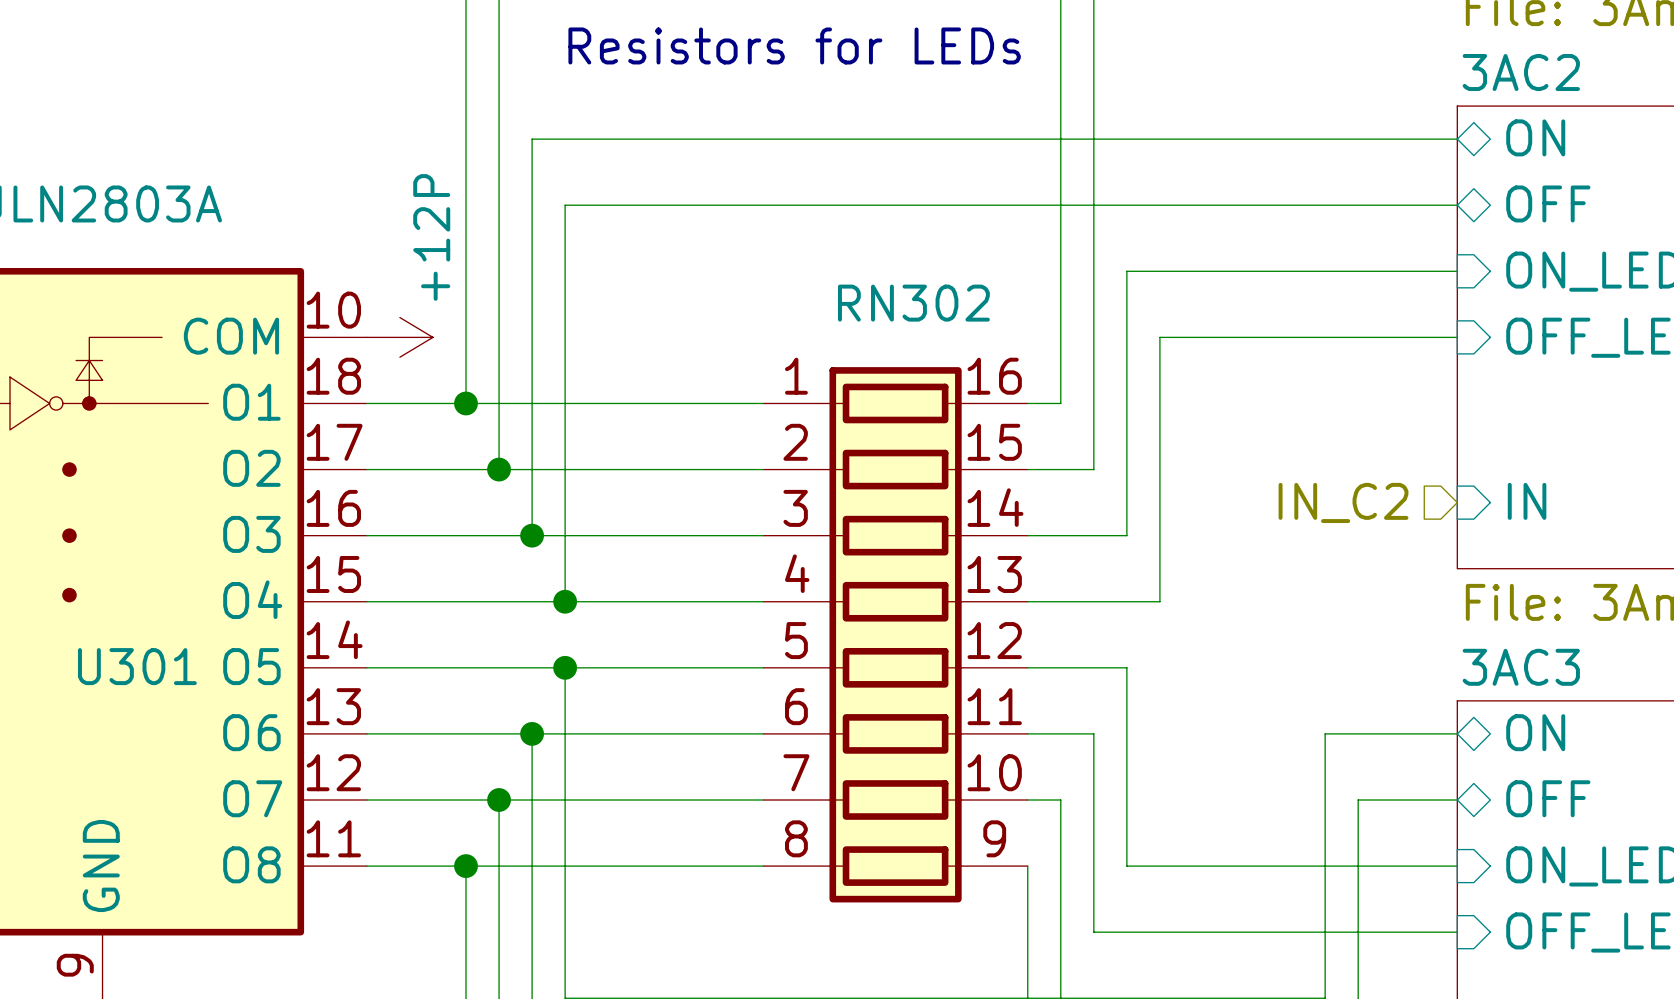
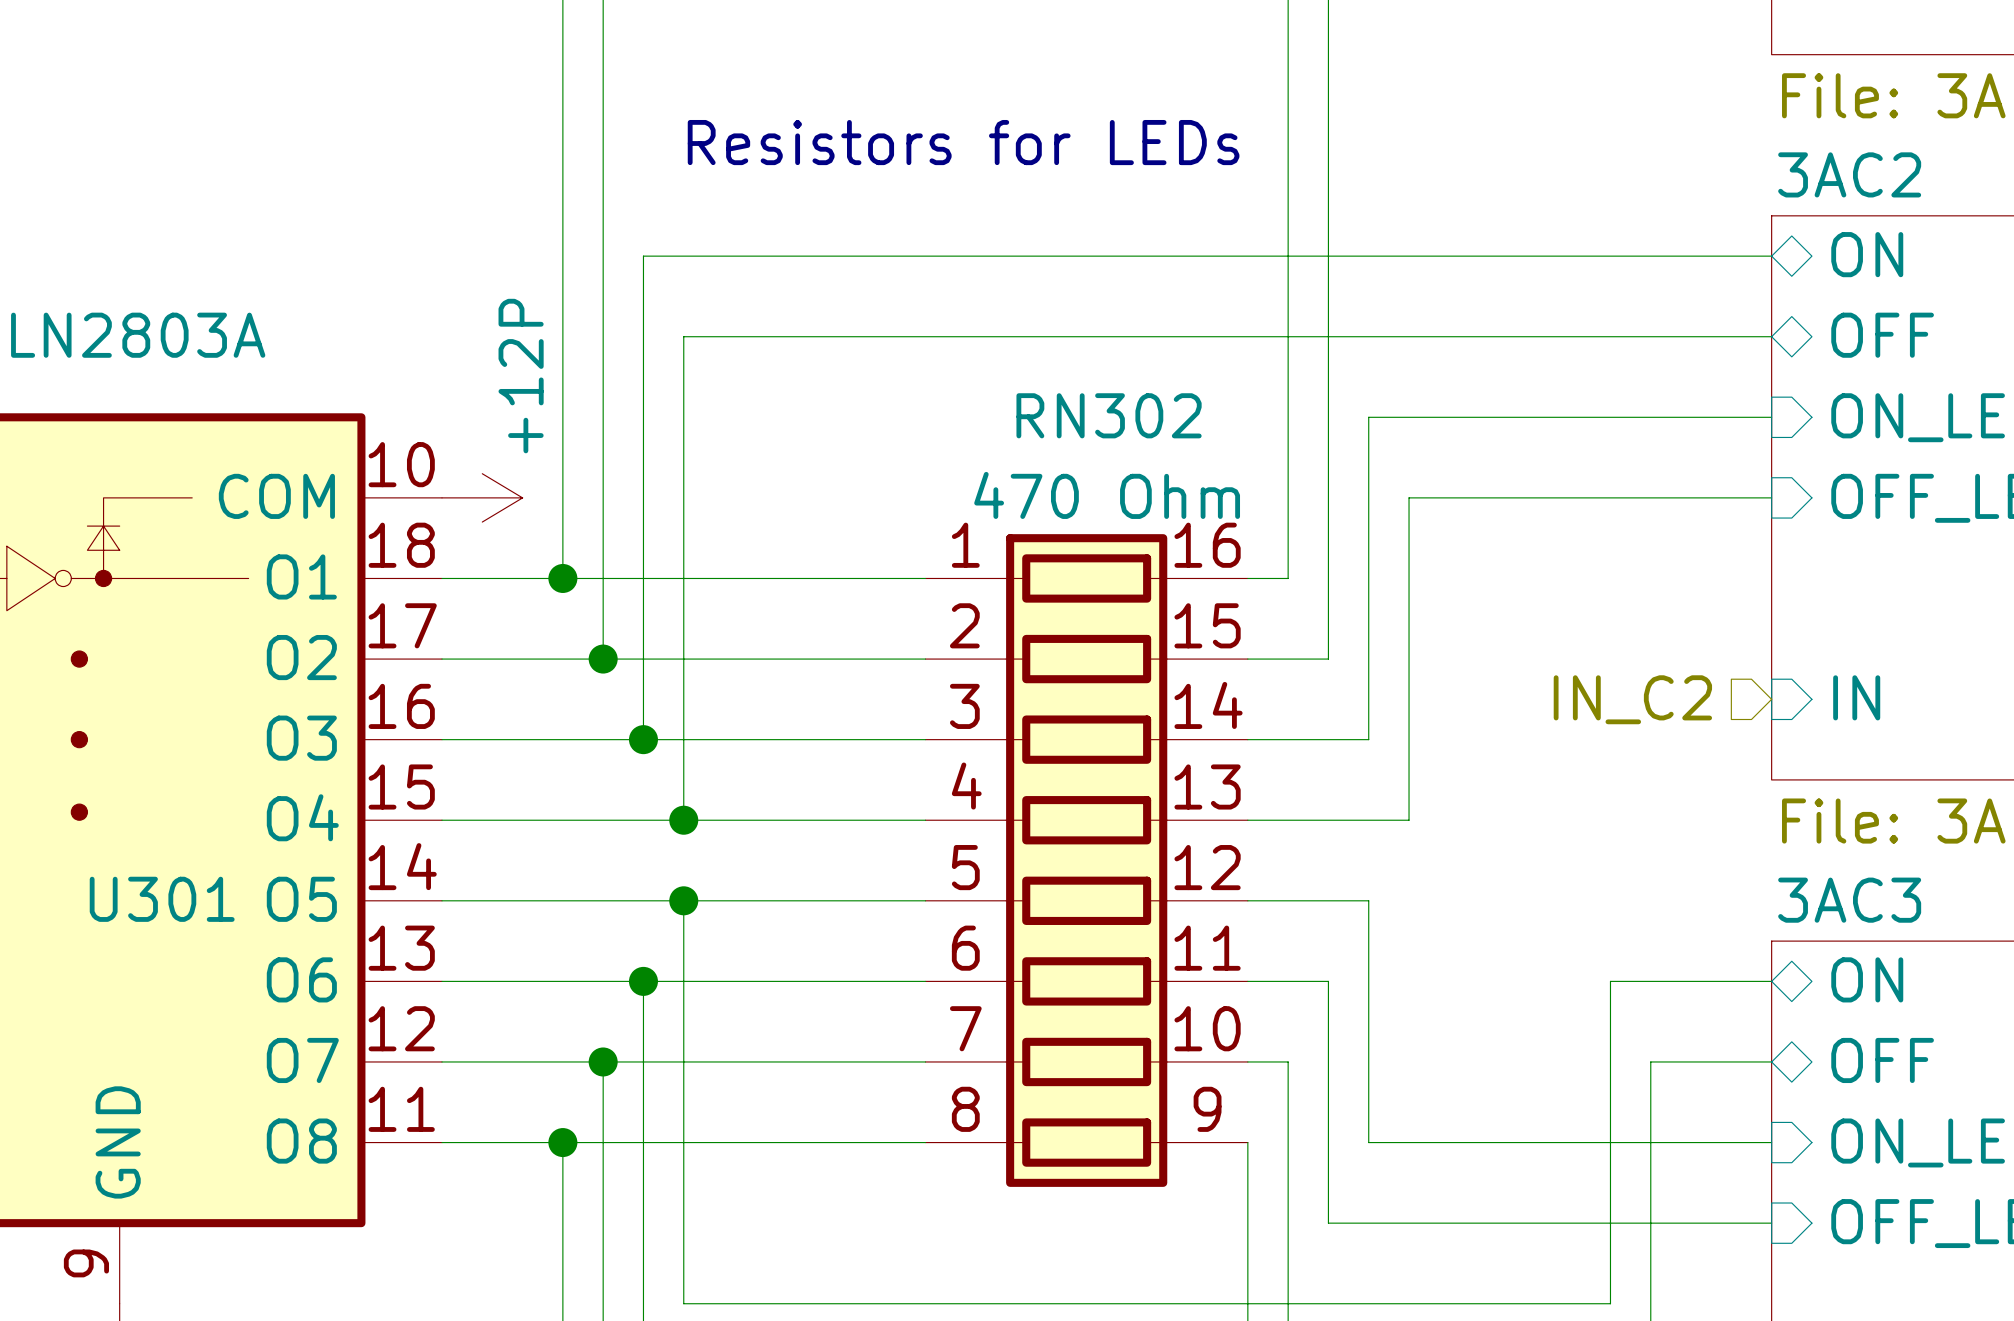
RN302 name position: RN302 (913, 303) -> RN302 (1109, 415)
RN302 value: none -> 470 Ohm (1107, 495)

